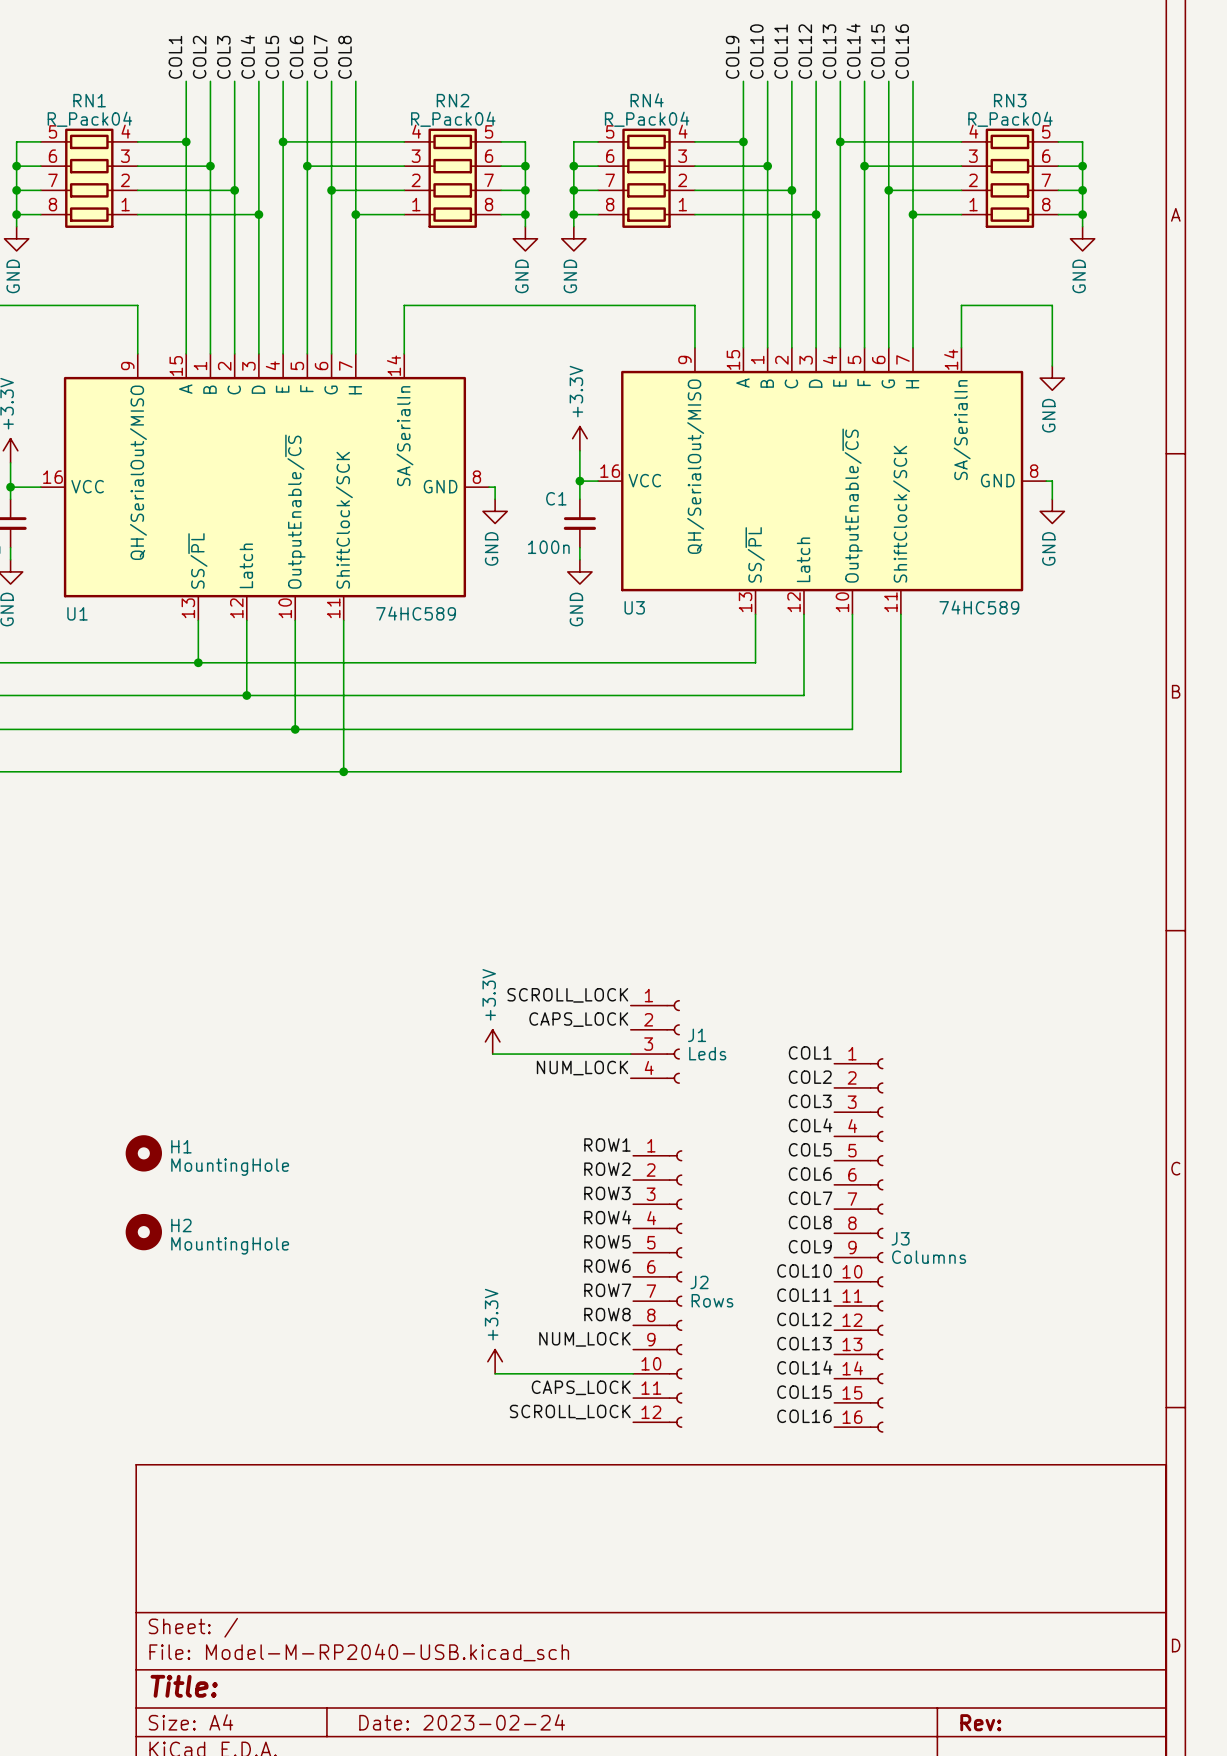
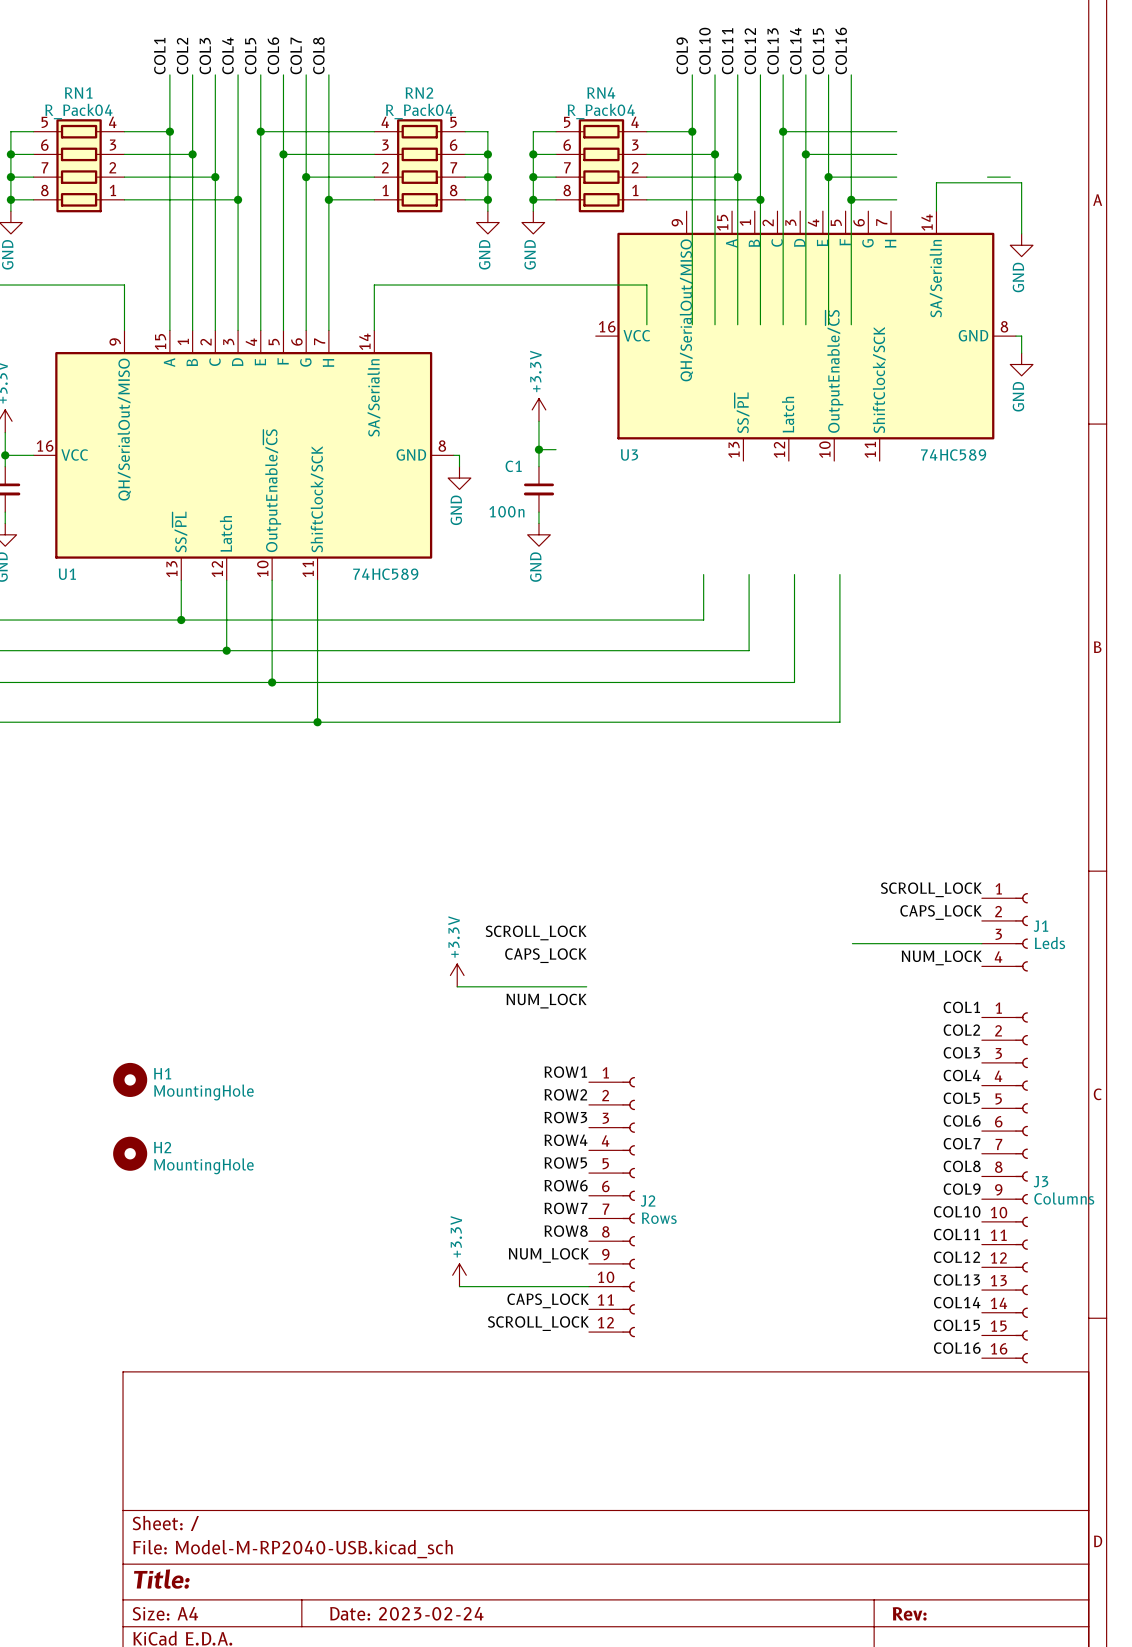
wire: (1058, 141) (1082, 141) (1082, 226) -> none
wire: (1058, 166) (1082, 166) -> none
junction: (1082, 166) -> none
RN3: R_Pack04 (1009, 178) -> none
junction: (1082, 190) -> none
wire: (1058, 214) (1082, 214) -> none
junction: (1082, 214) -> none
wire: none -> (936, 211) (936, 182) (1021, 182) (1021, 233)
power symbol position: GND (1082, 238) -> GND (1021, 245)
power symbol position: GND (1052, 378) -> GND (1021, 364)
U3 position: (822, 481) -> (805, 336)
wire: (1046, 481) (1052, 481) (1052, 499) -> (1015, 336) (1021, 336) (1021, 353)
power symbol: GND (1052, 511) -> none
label: none -> SCROLL_LOCK (931, 889)
label: none -> CAPS_LOCK (941, 912)
wire: none -> (852, 943) (981, 943)
label: none -> NUM_LOCK (941, 957)
J1 position: (655, 1041) -> (1004, 932)
label position: COL1 (810, 1052) -> COL1 (961, 1007)
label position: COL2 (810, 1077) -> COL2 (961, 1030)
label position: COL3 (810, 1101) -> COL3 (961, 1052)
label position: COL4 (810, 1125) -> COL4 (962, 1075)
label position: COL5 (810, 1149) -> COL5 (961, 1098)
label position: COL6 (810, 1174) -> COL6 (962, 1120)
label position: COL7 (810, 1198) -> COL7 (962, 1143)
label position: COL8 (810, 1222) -> COL8 (962, 1166)
J3 position: (858, 1245) -> (1004, 1187)
label position: COL9 (810, 1246) -> COL9 (962, 1189)
label position: COL10 (804, 1270) -> COL10 (957, 1211)
label position: COL11 (804, 1295) -> COL11 (957, 1234)
label position: COL12 (804, 1319) -> COL12 (957, 1257)
label position: COL13 (804, 1343) -> COL13 (957, 1279)
label position: COL14 (804, 1367) -> COL14 (957, 1302)
label position: COL15 (804, 1392) -> COL15 (957, 1325)
label position: COL16 (804, 1416) -> COL16 (957, 1348)

